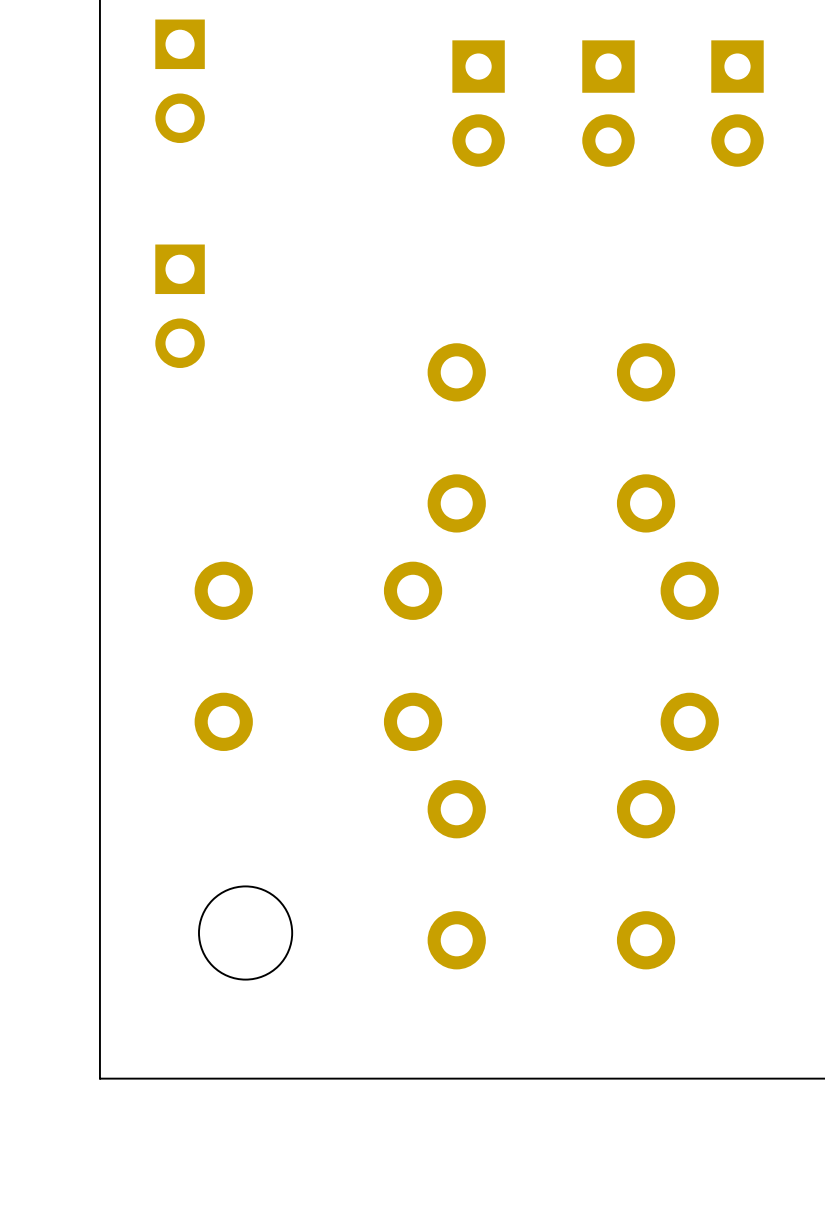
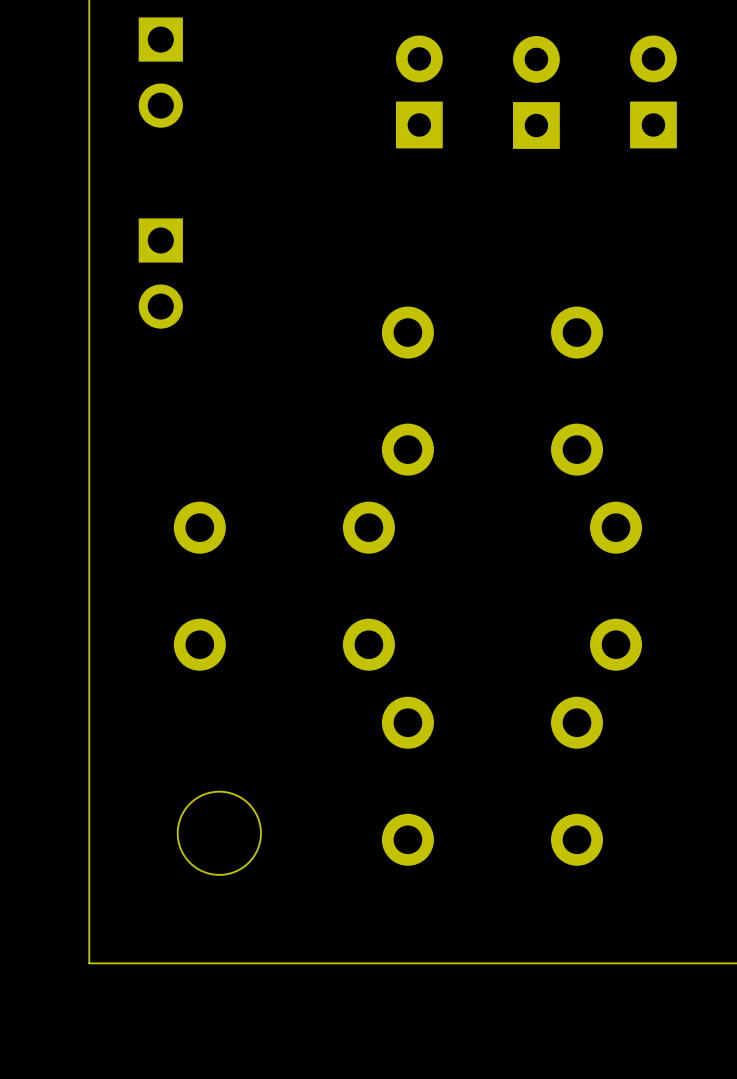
part rotation: 0° (478, 103) -> 180° (419, 91)
part rotation: 0° (608, 103) -> 180° (536, 92)
part rotation: 0° (737, 103) -> 180° (653, 91)

